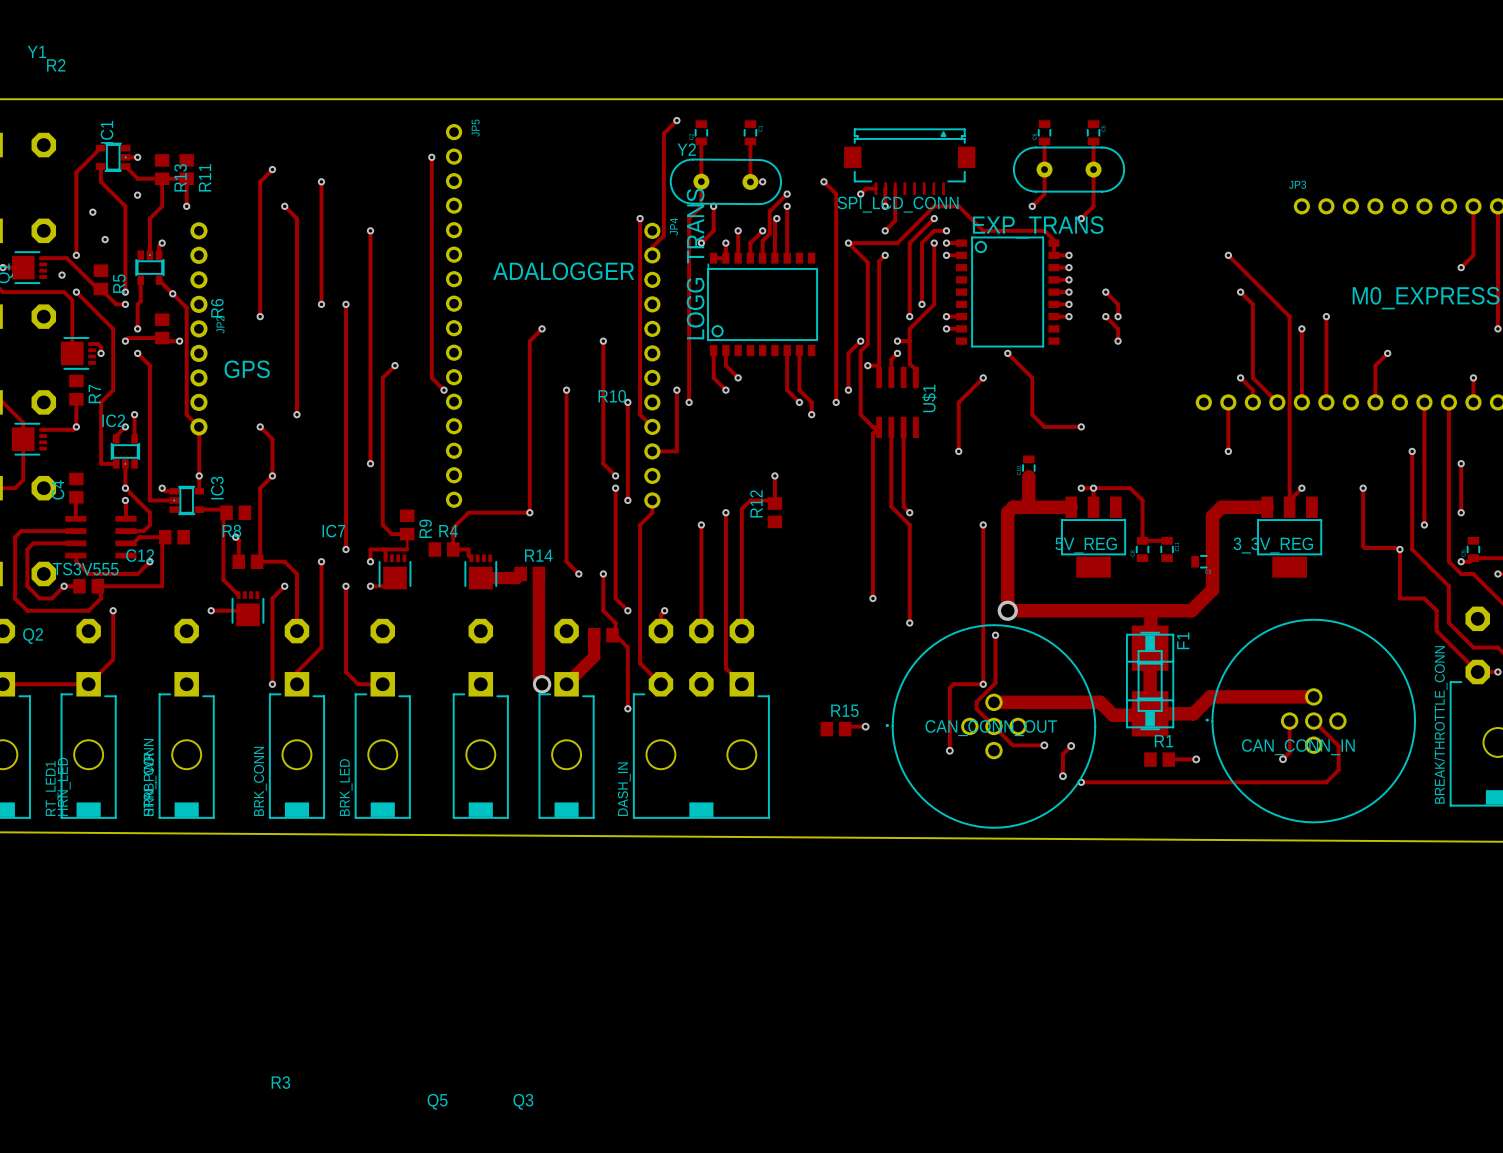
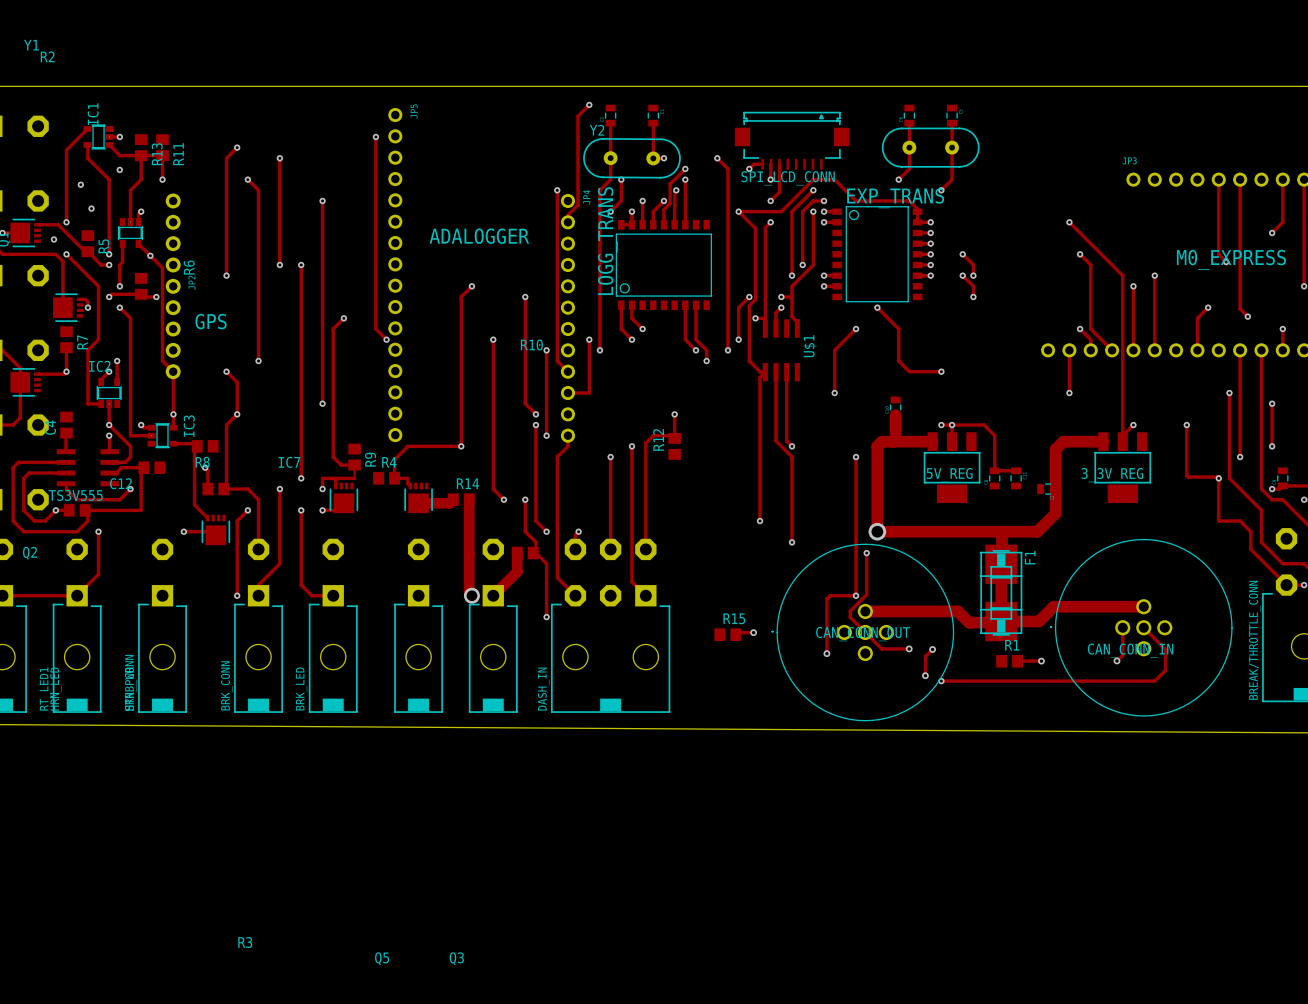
track: none -> (1218, 179) (1218, 254) (1226, 262)
track: none -> (1240, 179) (1240, 308) (1247, 316)
via: none -> (1226, 262)
via: none -> (1247, 316)

